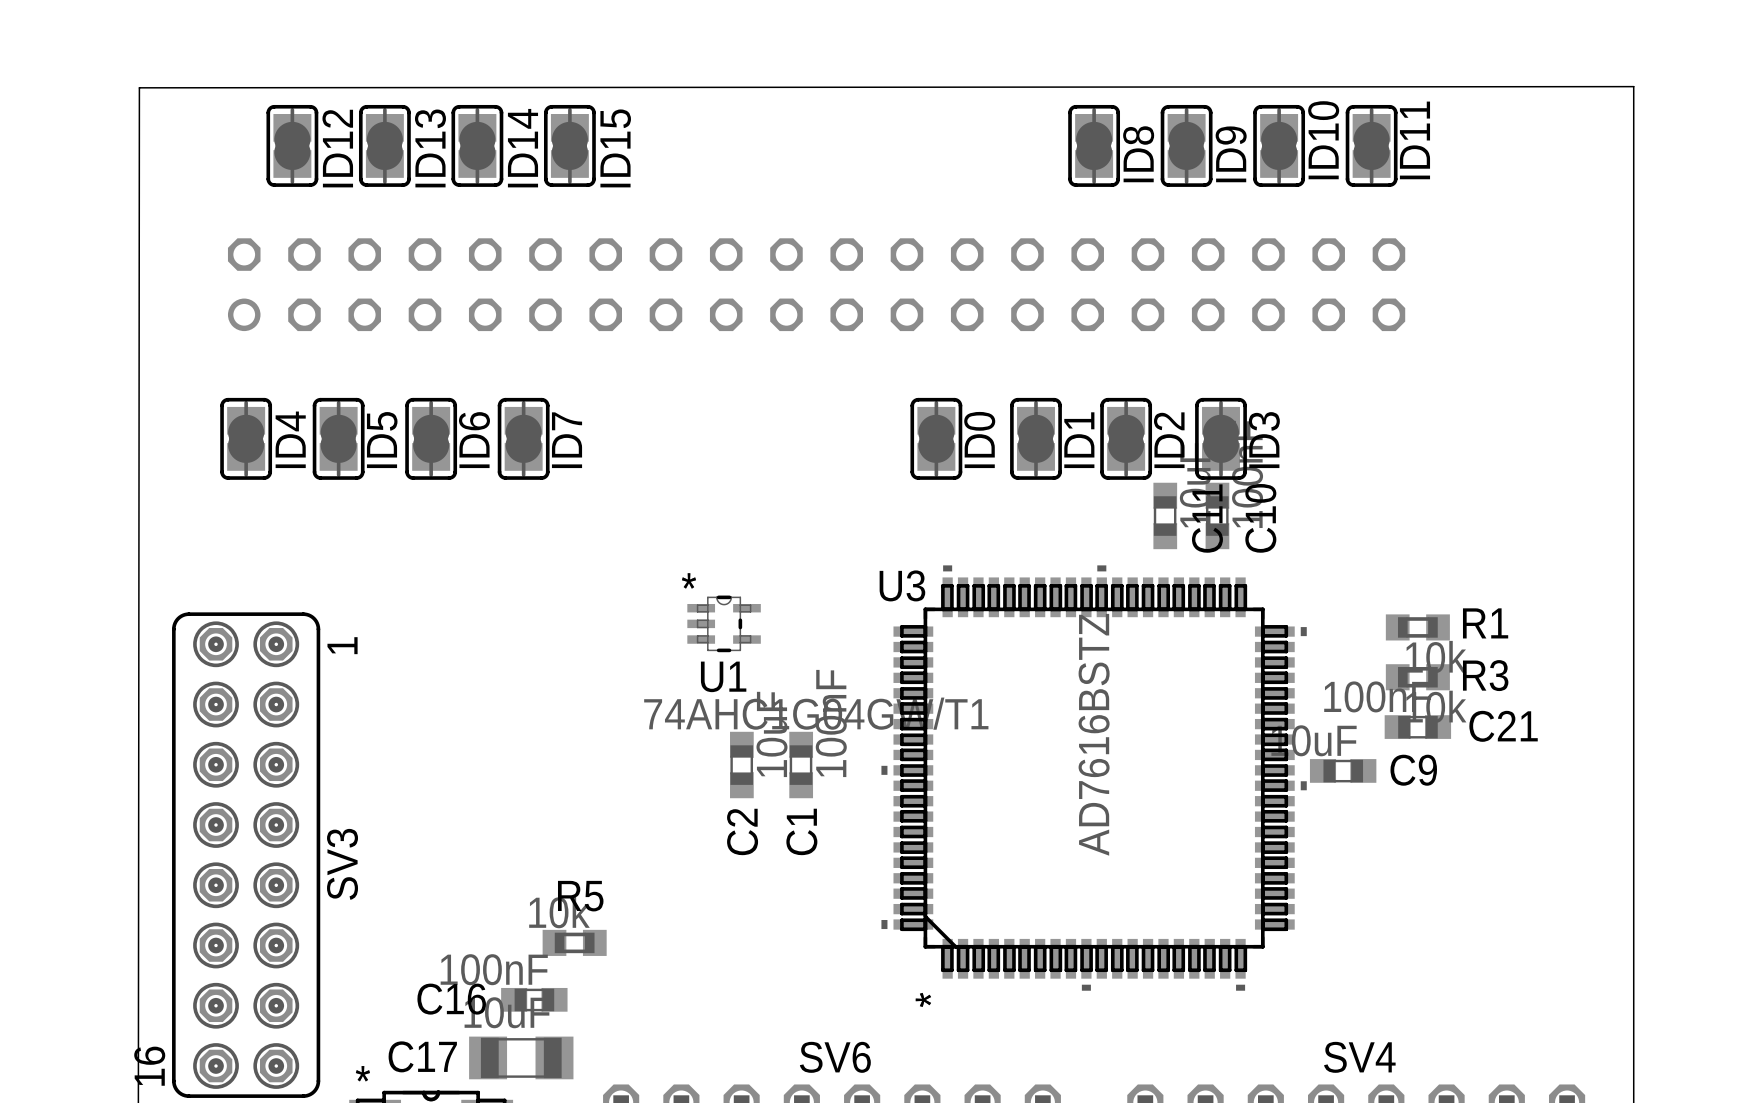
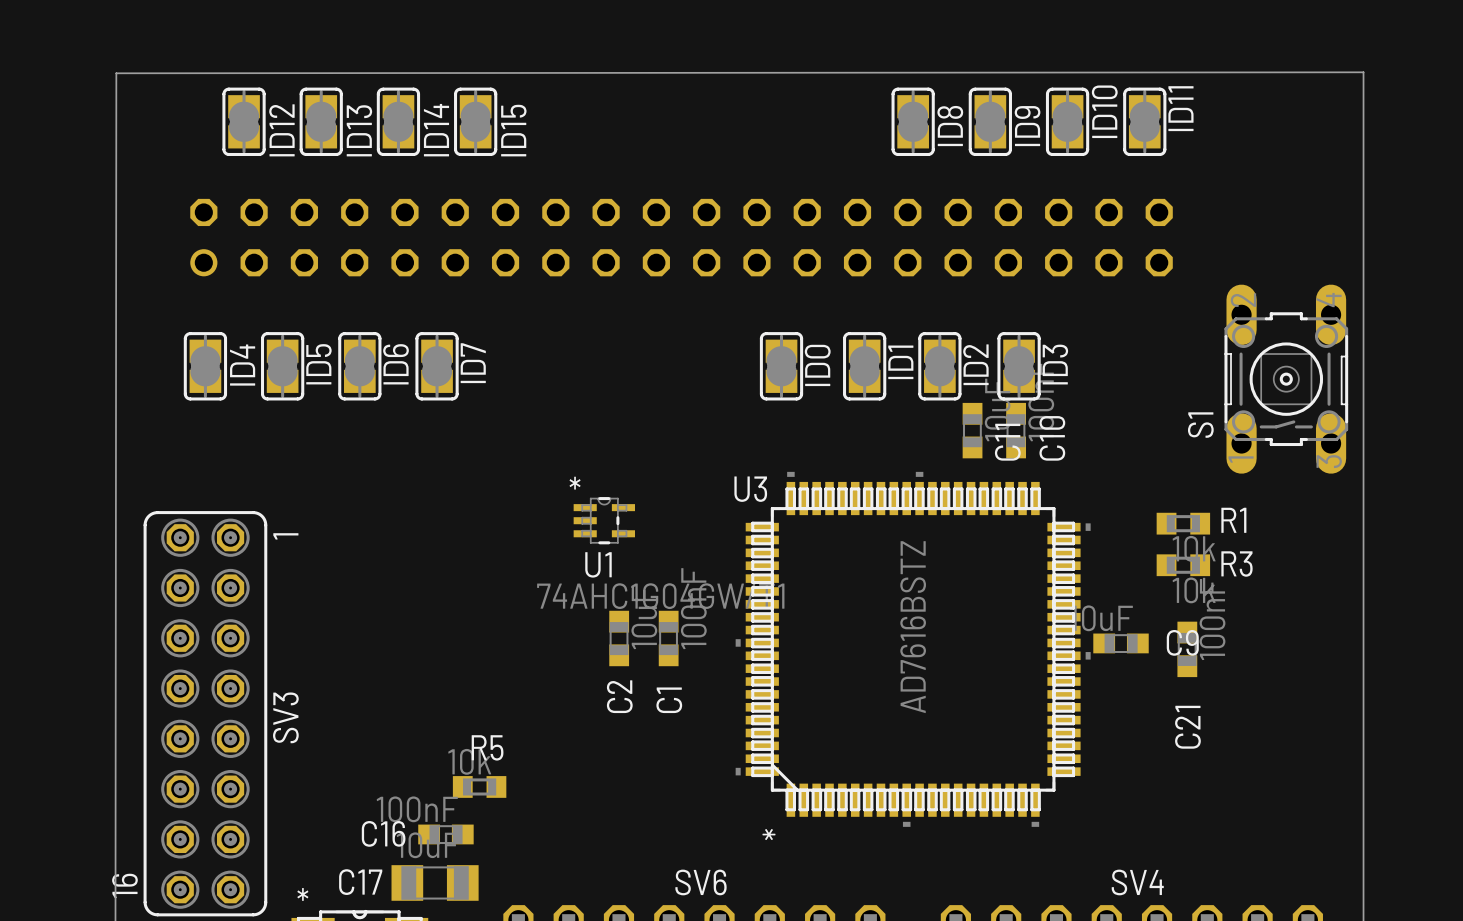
S1: none -> (1286, 379)
C21 rotation: 0° (1417, 727) -> 90° clockwise (1187, 649)
C21 position: (1417, 727) -> (1187, 649)

